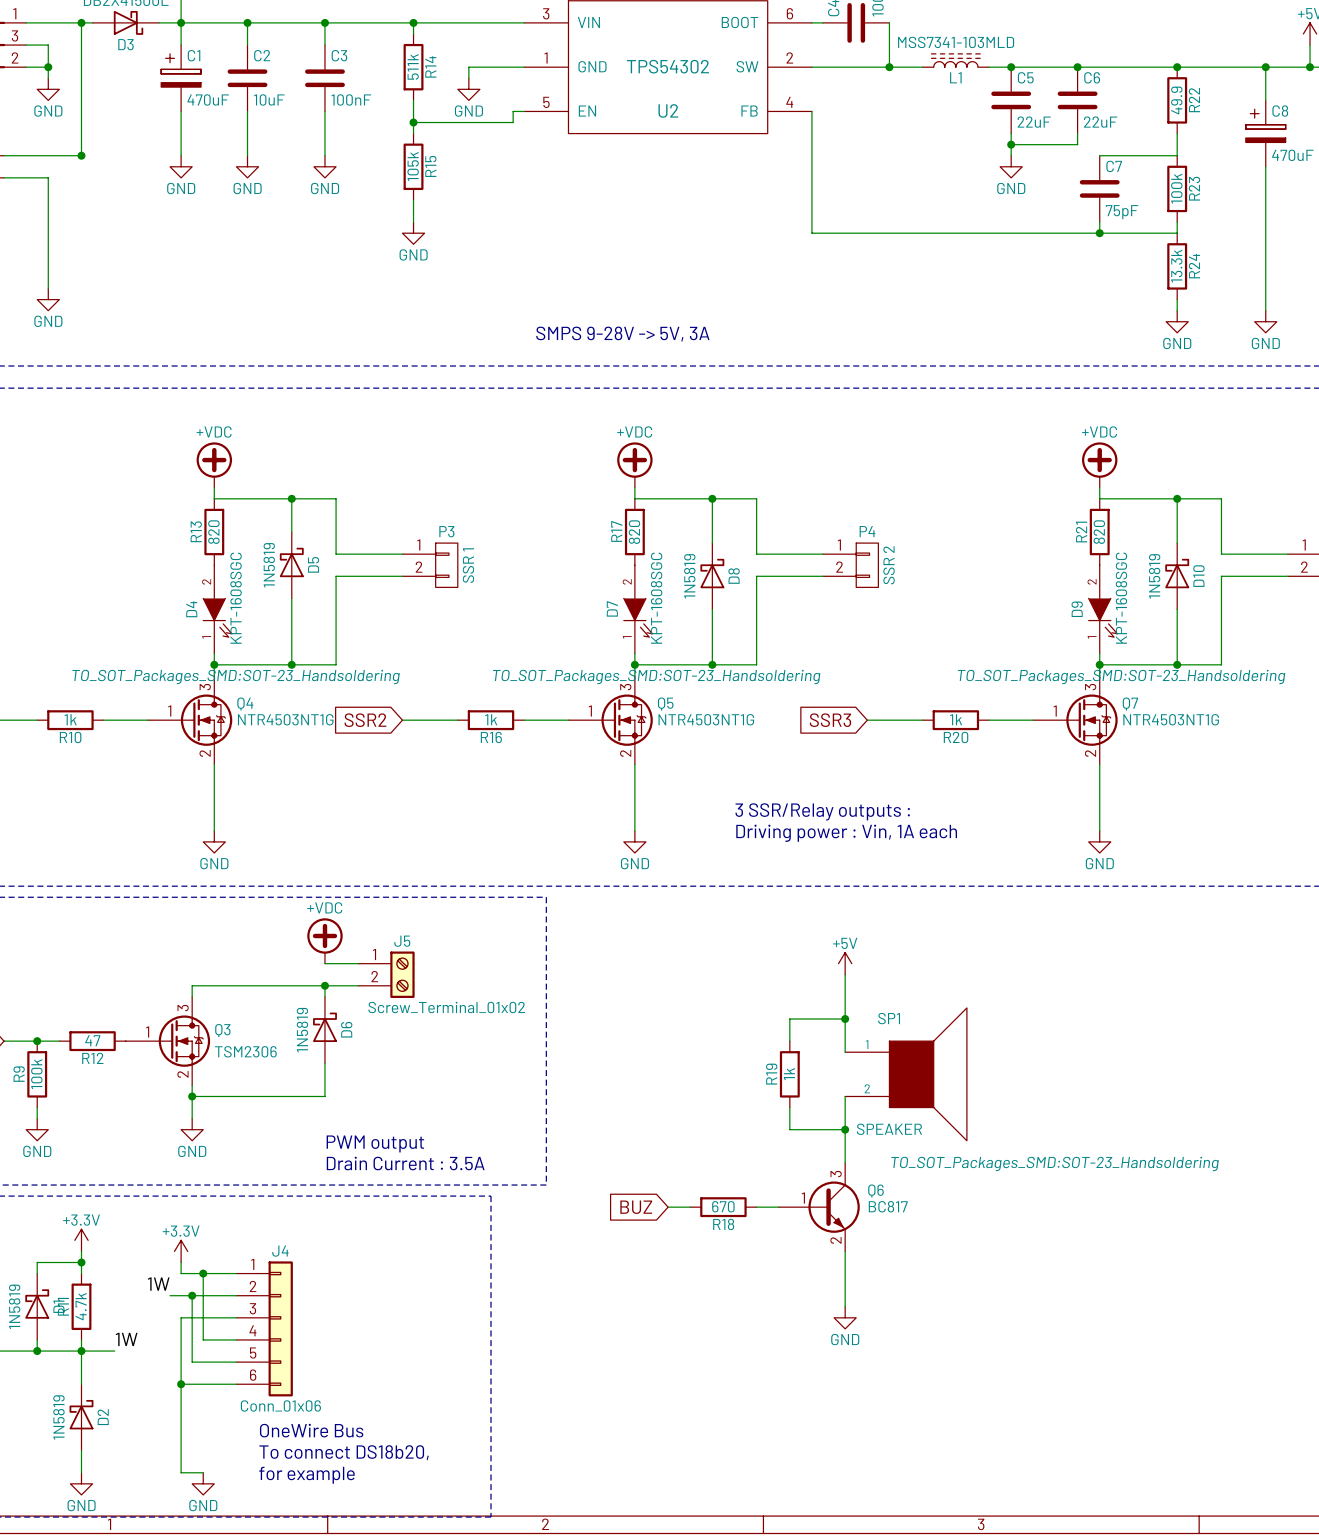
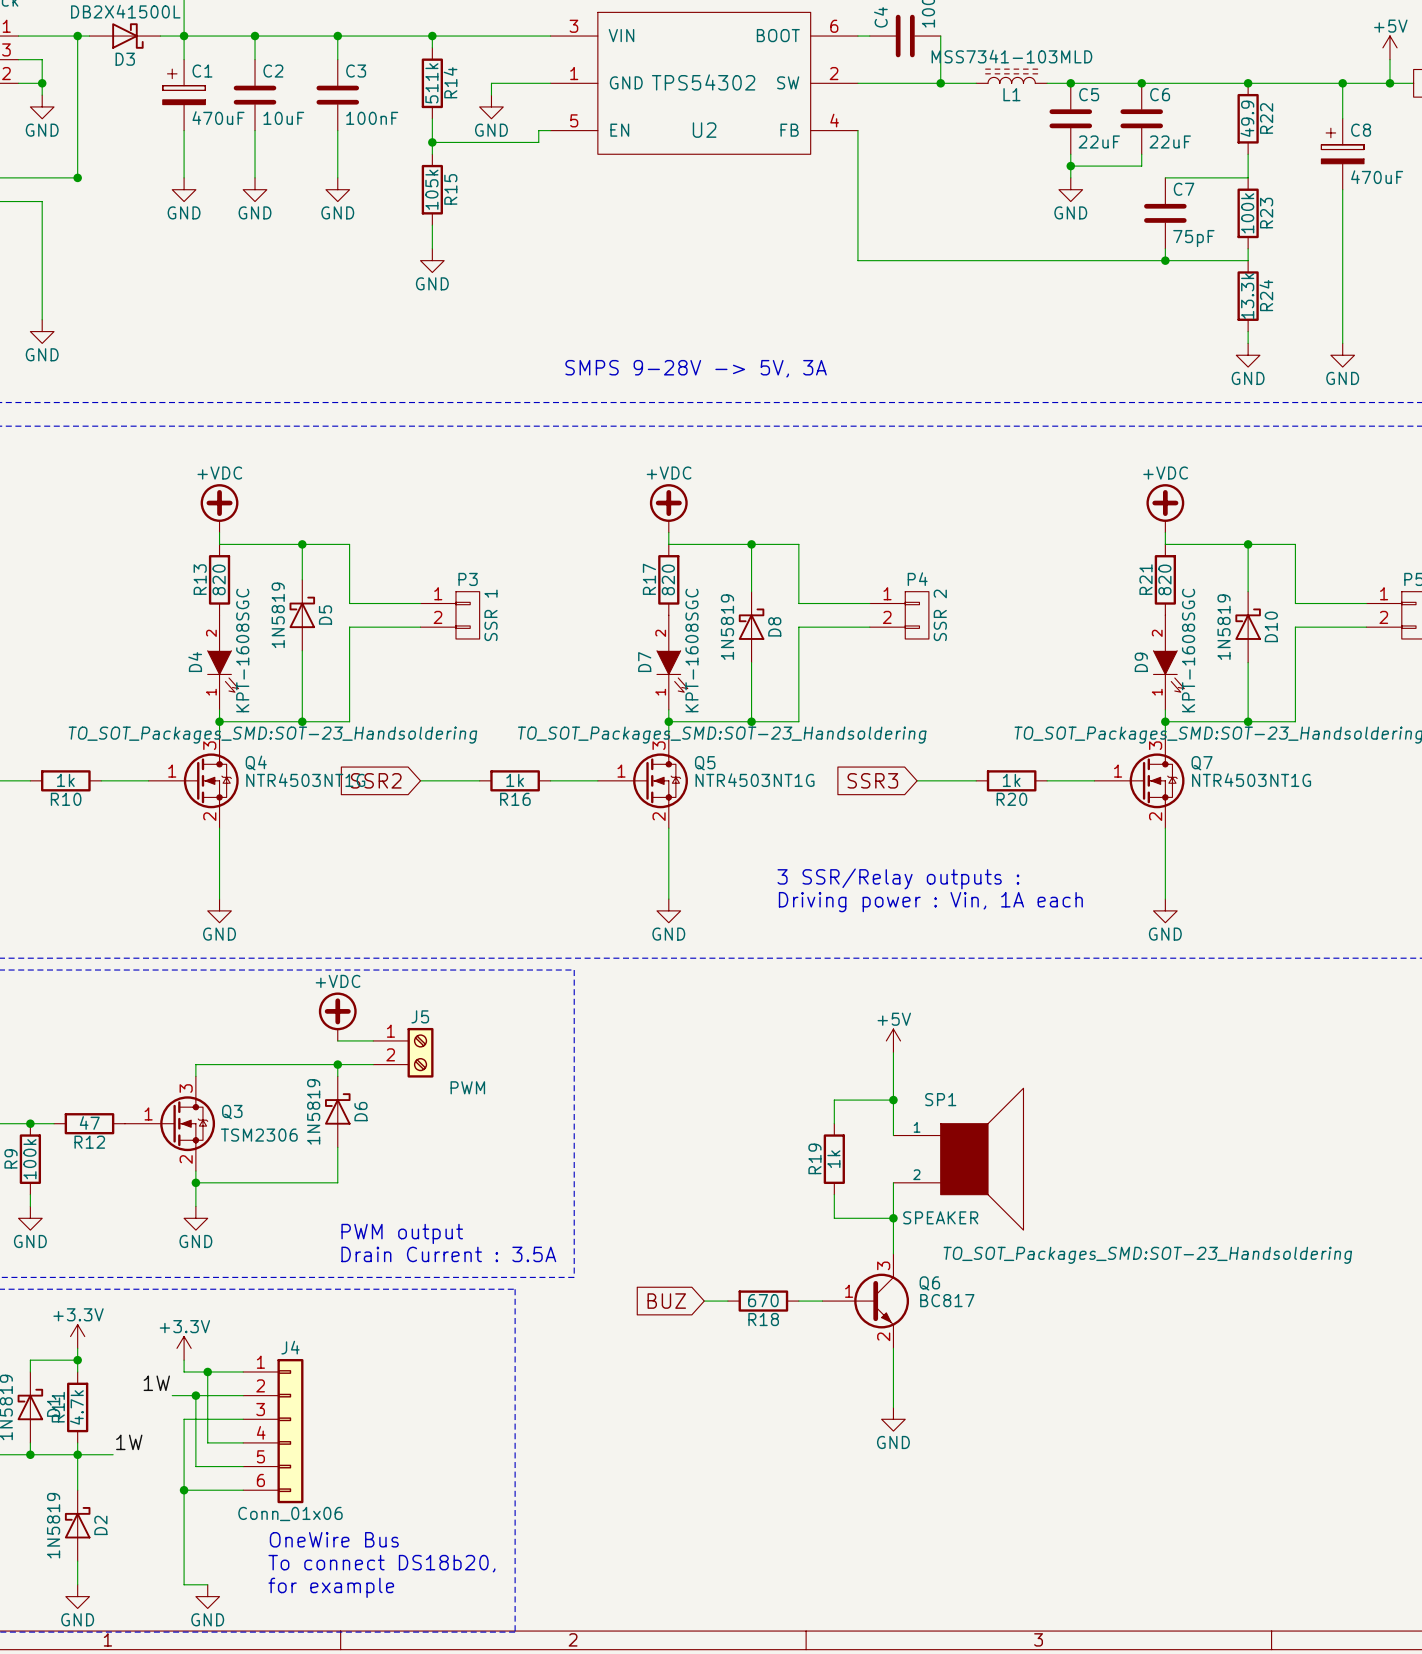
J5 value: Screw_Terminal_01x02 (446, 1007) -> PWM (467, 1087)

